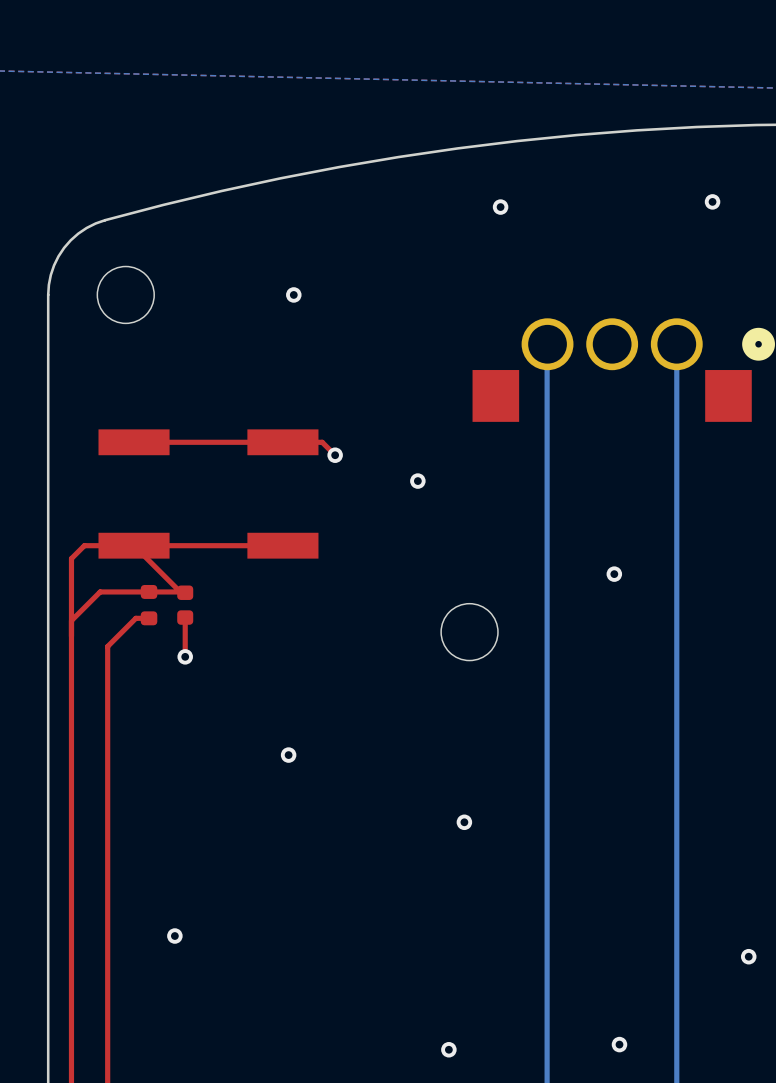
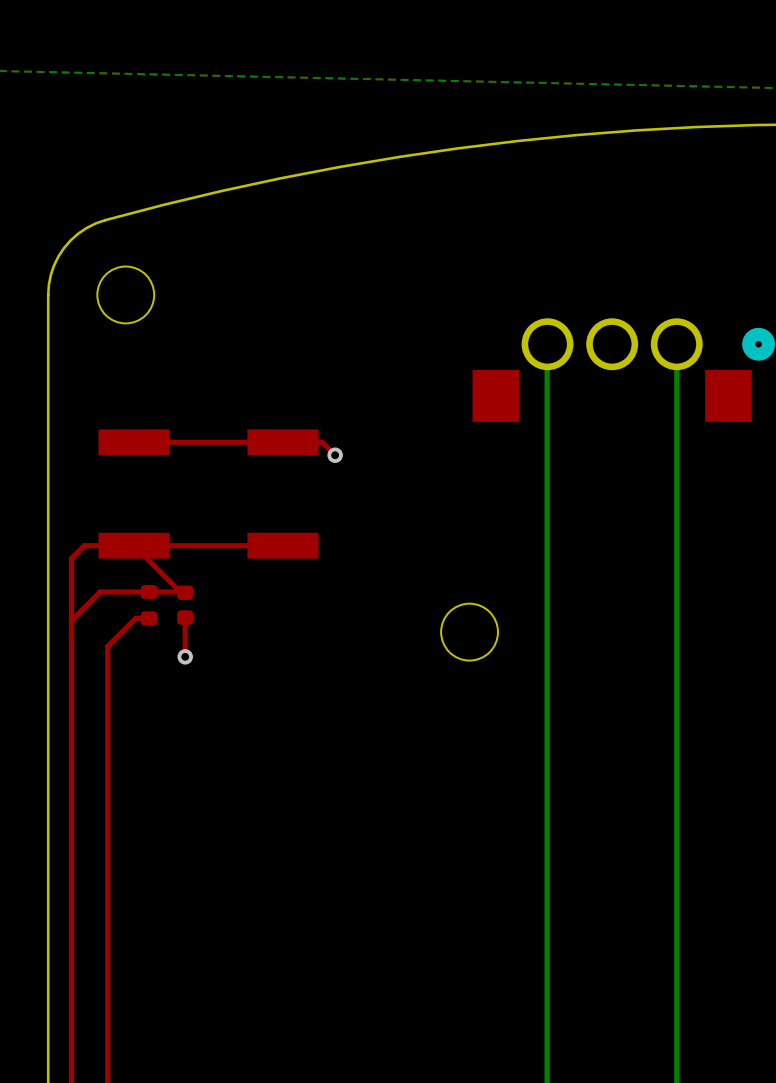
via: (712, 201) -> none
via: (500, 207) -> none
via: (293, 294) -> none
via: (417, 481) -> none
via: (614, 574) -> none
via: (288, 755) -> none
via: (464, 822) -> none
via: (174, 936) -> none
via: (748, 956) -> none
via: (619, 1044) -> none
via: (448, 1049) -> none

